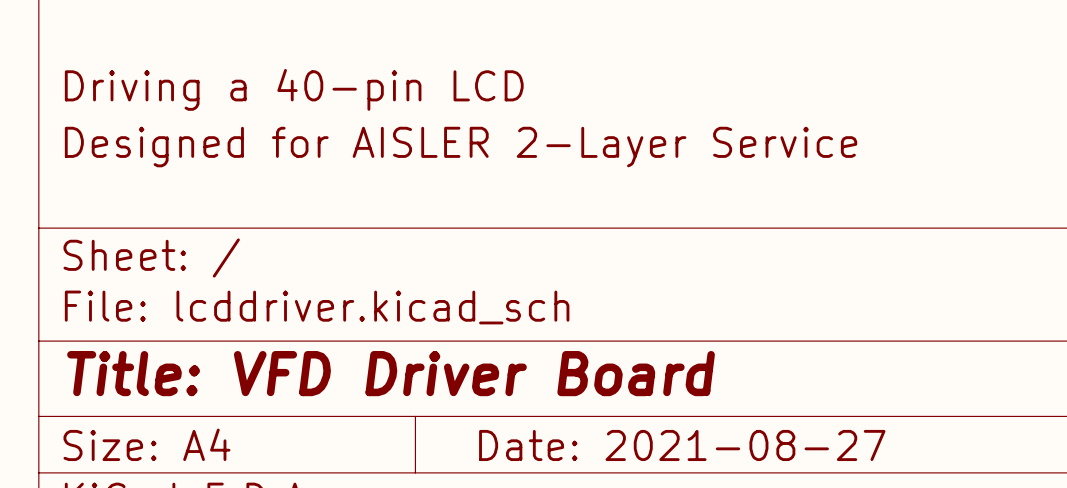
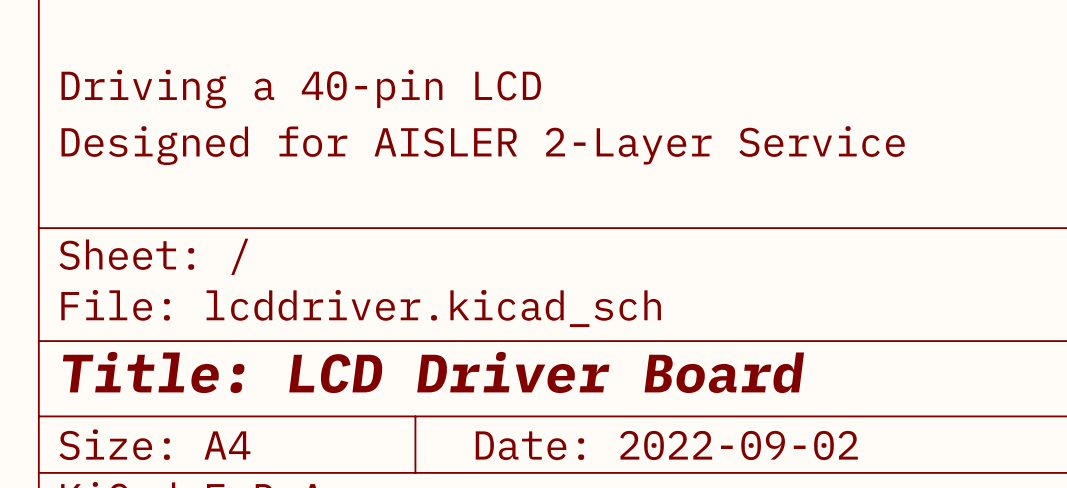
title block: Title: VFD Driver Board (391, 373) -> Title: LCD Driver Board (433, 372)
title block: Date: 2021-08-27 (682, 445) -> Date: 2022-09-02 (666, 445)

